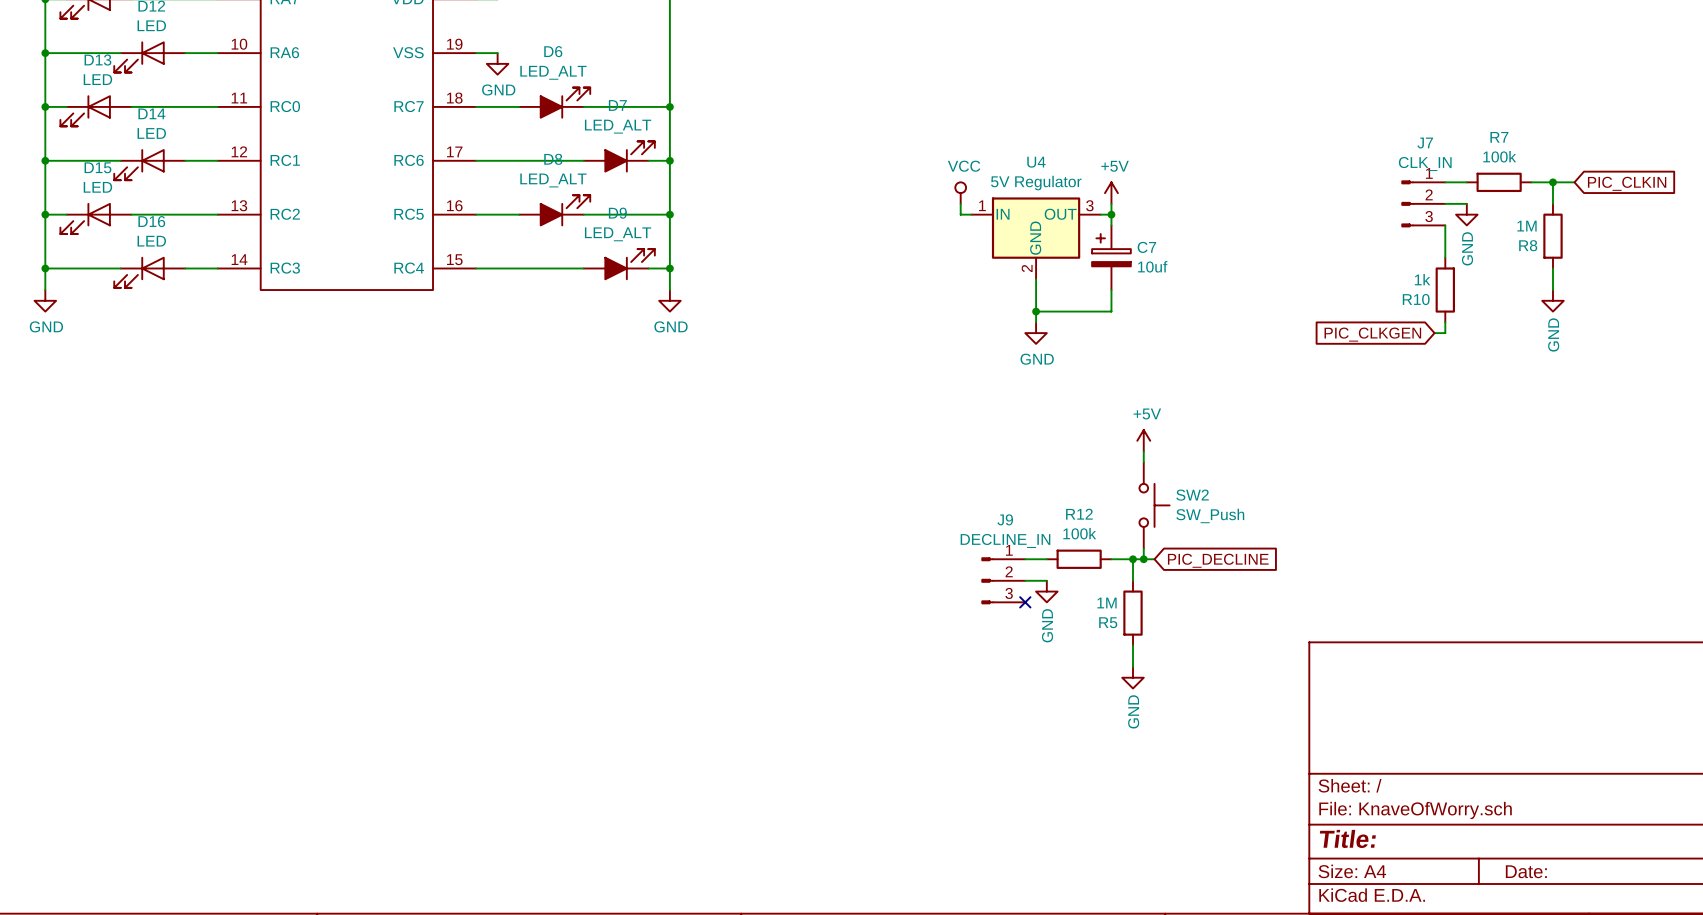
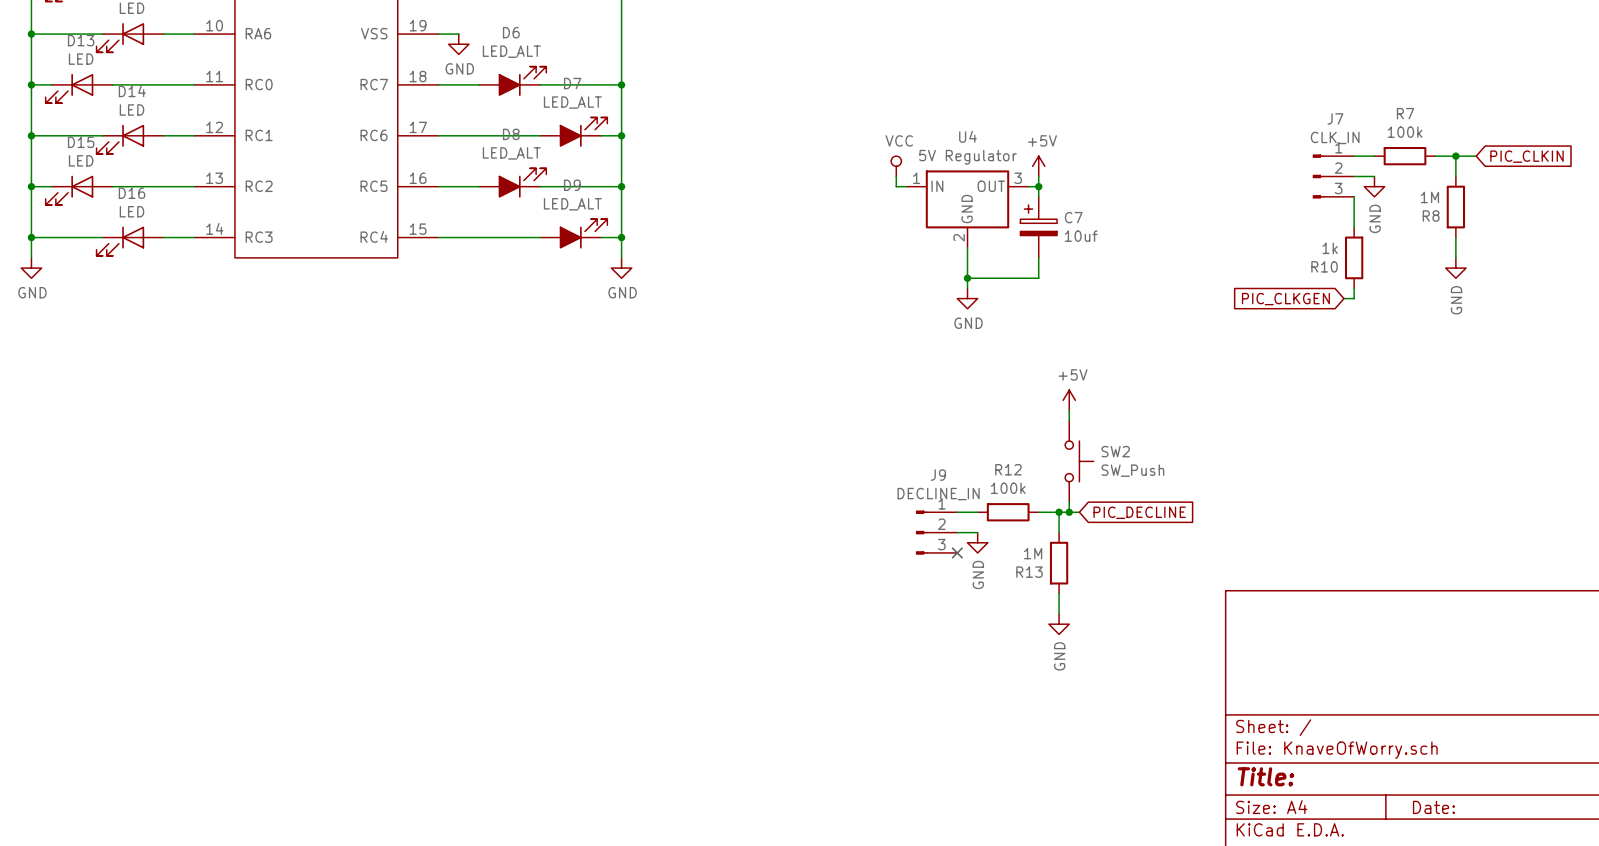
R5 name: R5 (1108, 622) -> R13 (1029, 572)

